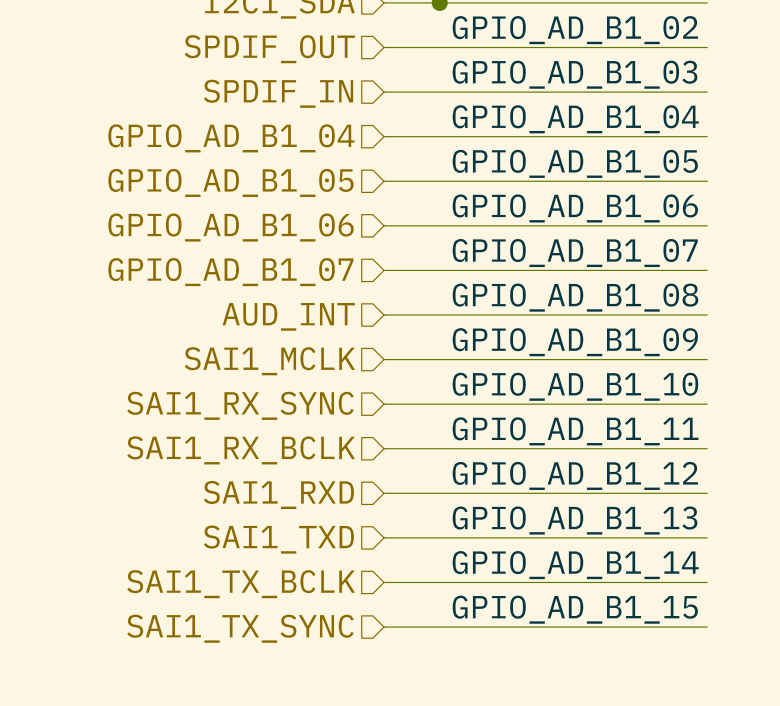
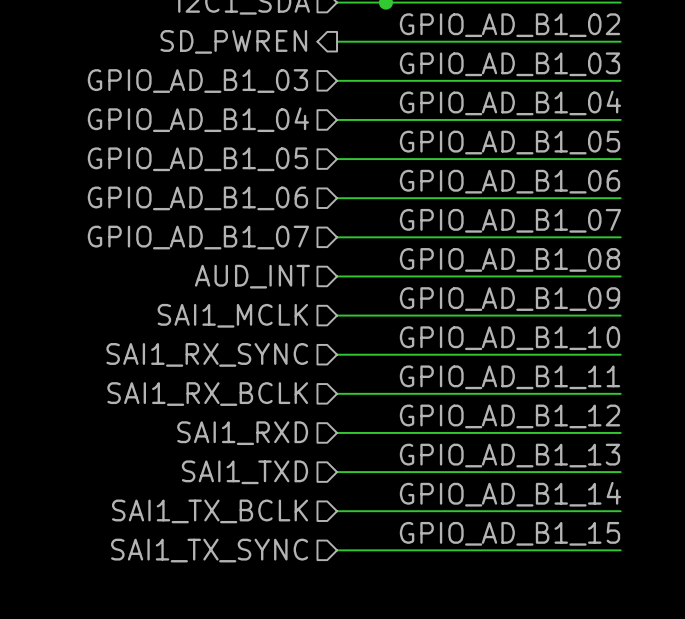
hierarchical label shape: input (269, 49) -> output (233, 41)
hierarchical label: SPDIF_OUT (269, 49) -> SD_PWREN (233, 41)
hierarchical label: SPDIF_IN (278, 93) -> GPIO_AD_B1_03 (197, 81)

